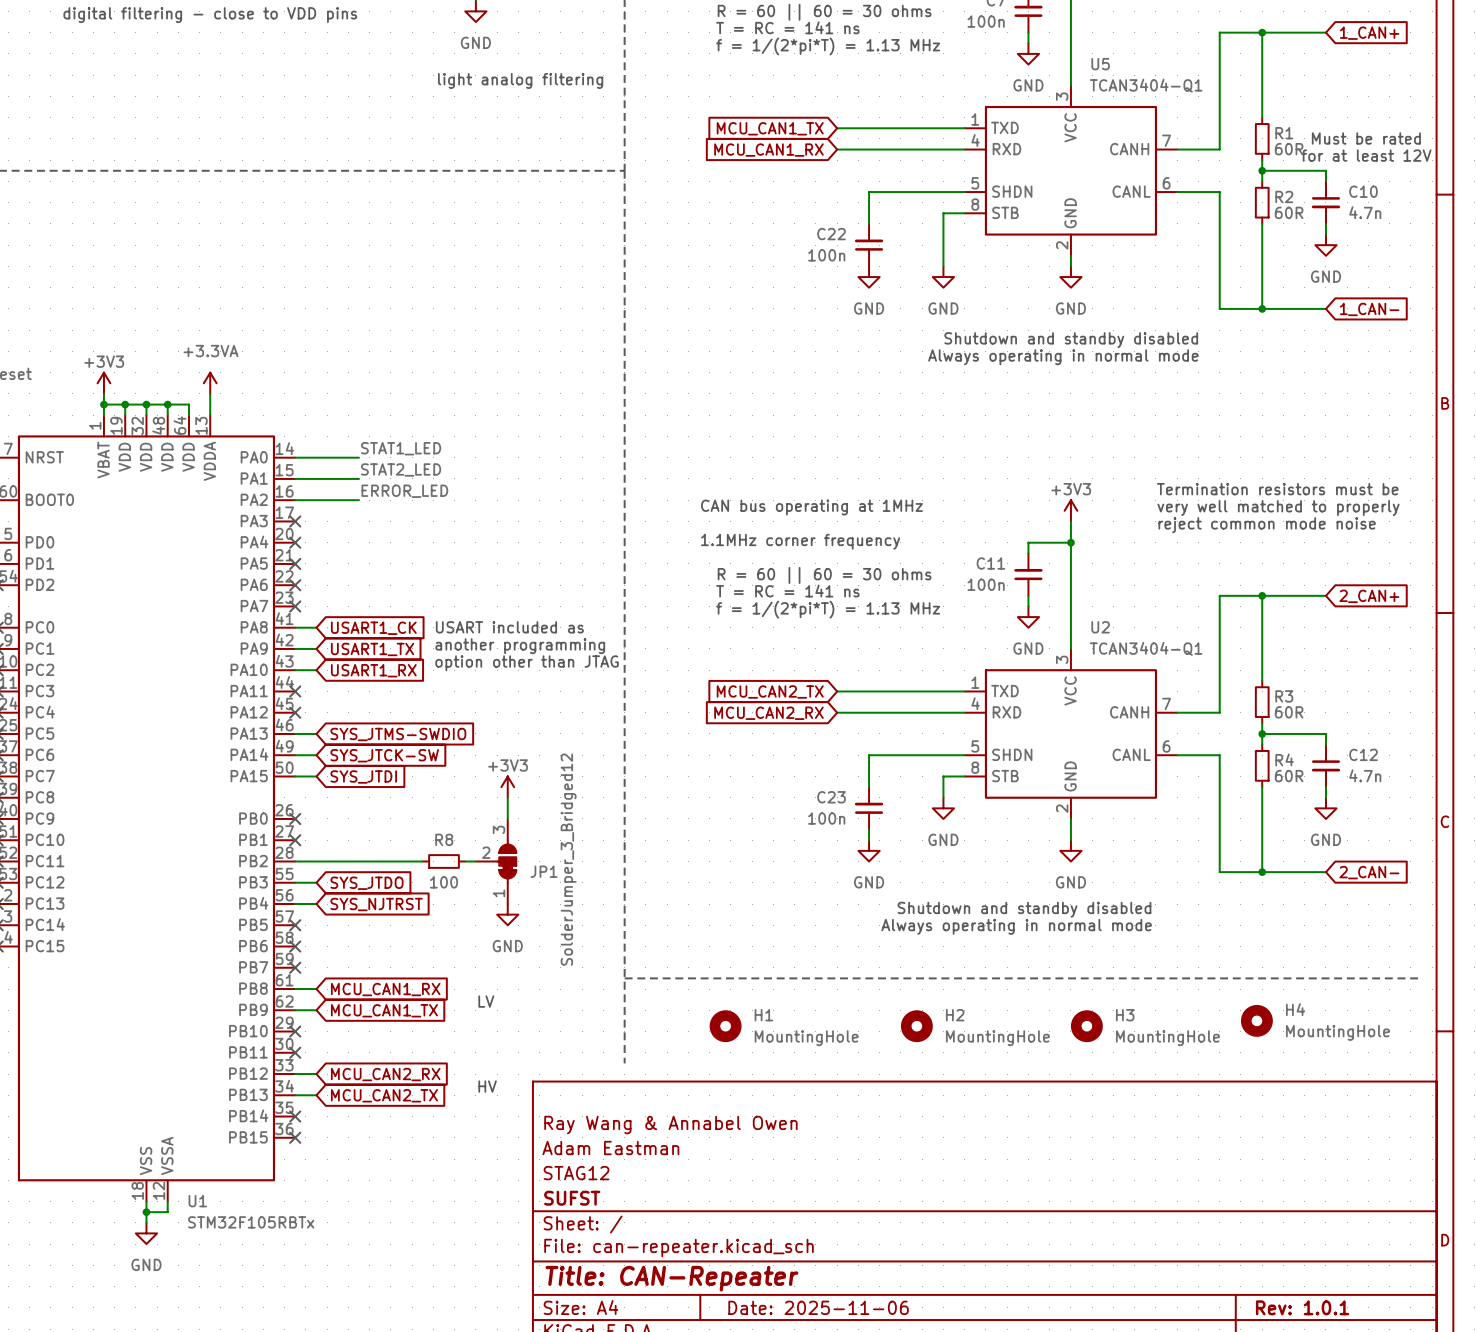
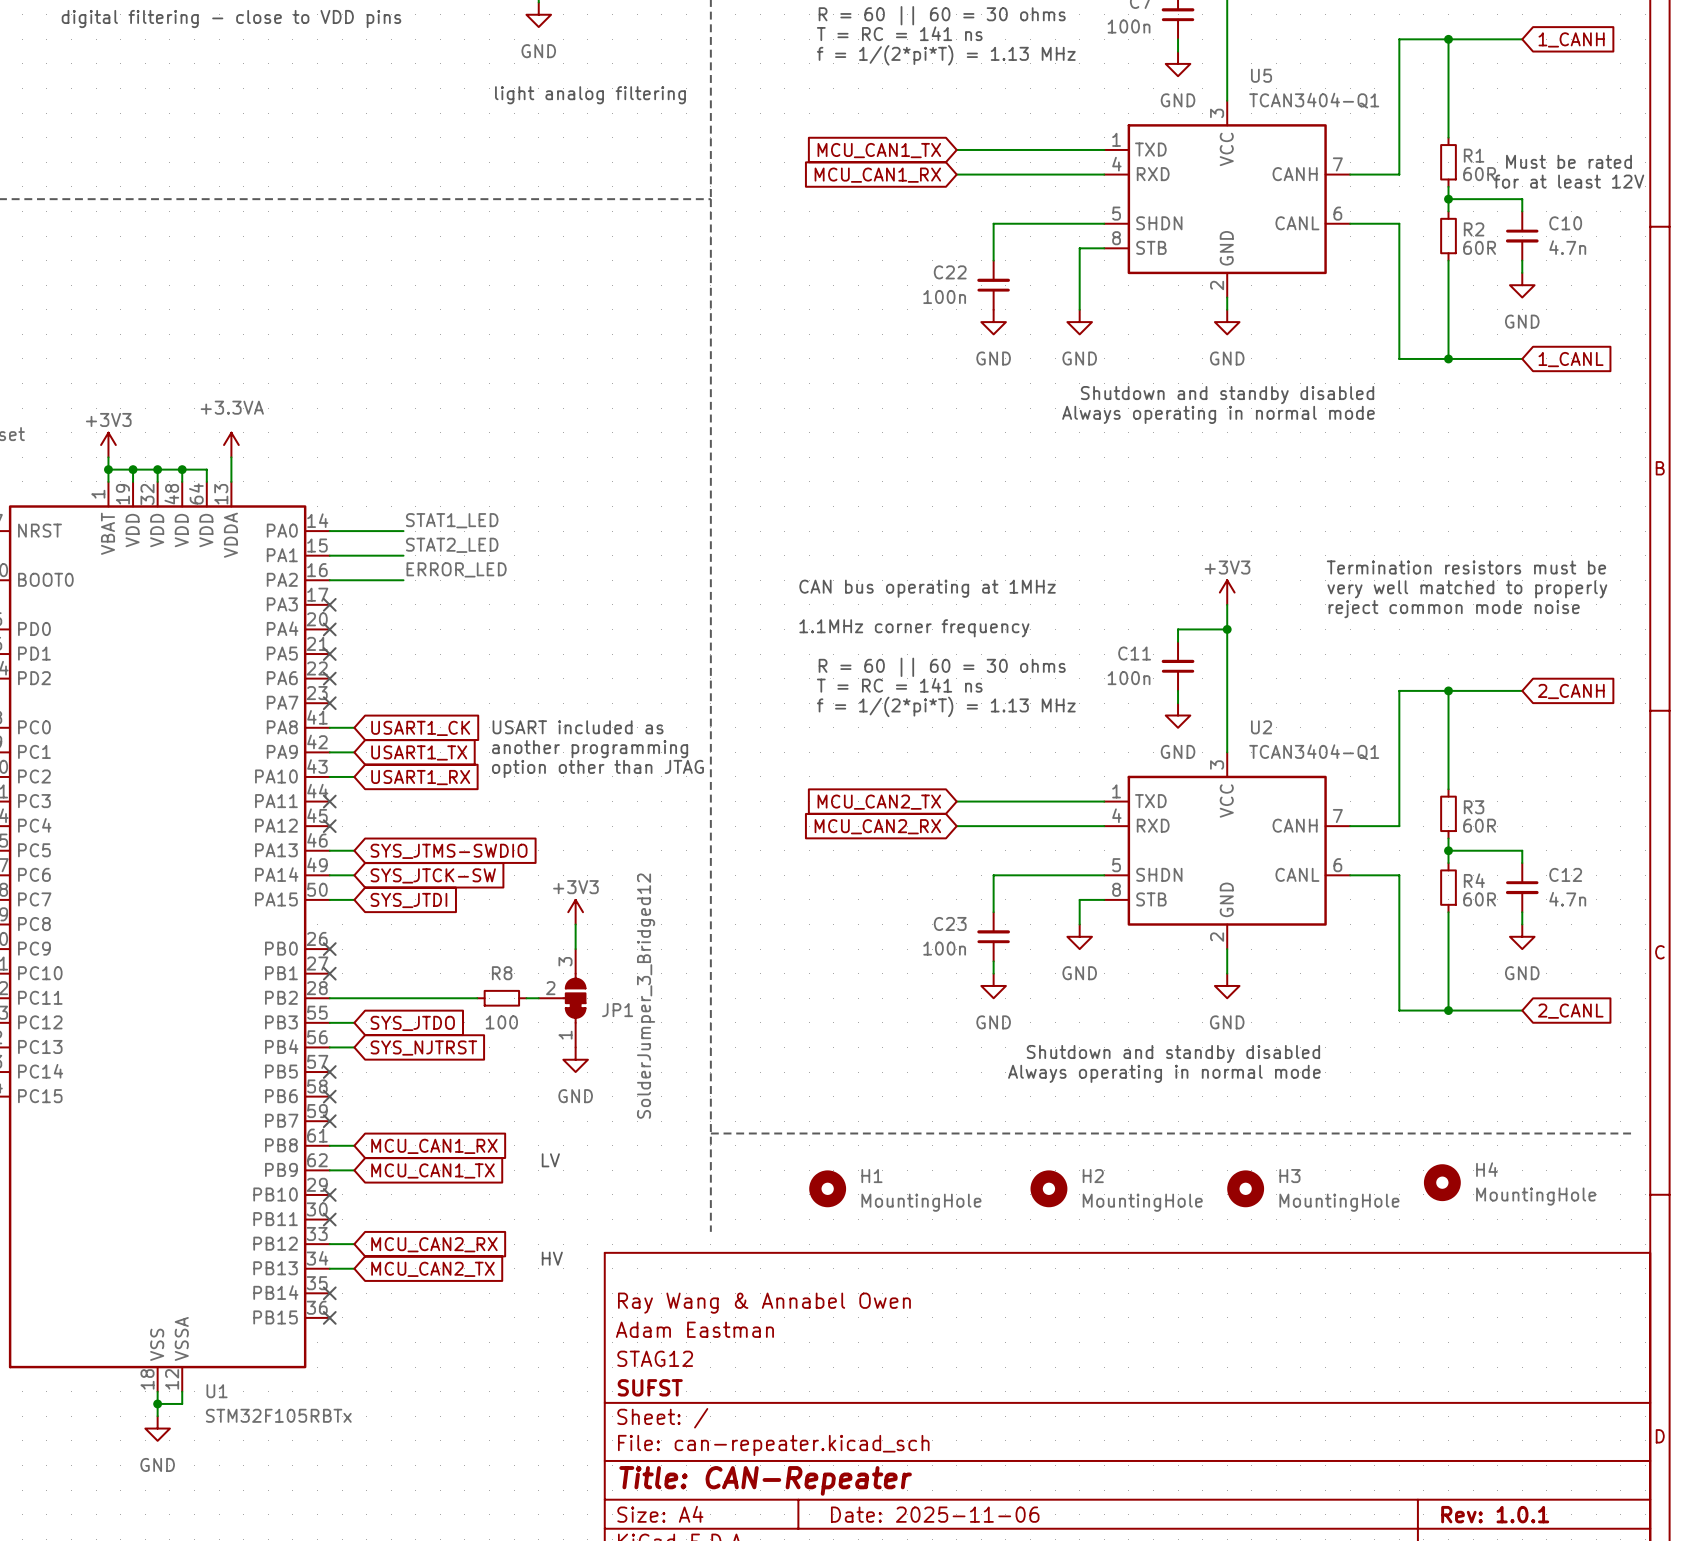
global label: 1_CAN+ (1369, 33) -> 1_CANH (1571, 39)
global label: 1_CAN- (1369, 309) -> 1_CANL (1571, 359)
global label: 2_CAN+ (1369, 596) -> 2_CANH (1571, 691)
global label: 2_CAN- (1369, 872) -> 2_CANL (1570, 1011)

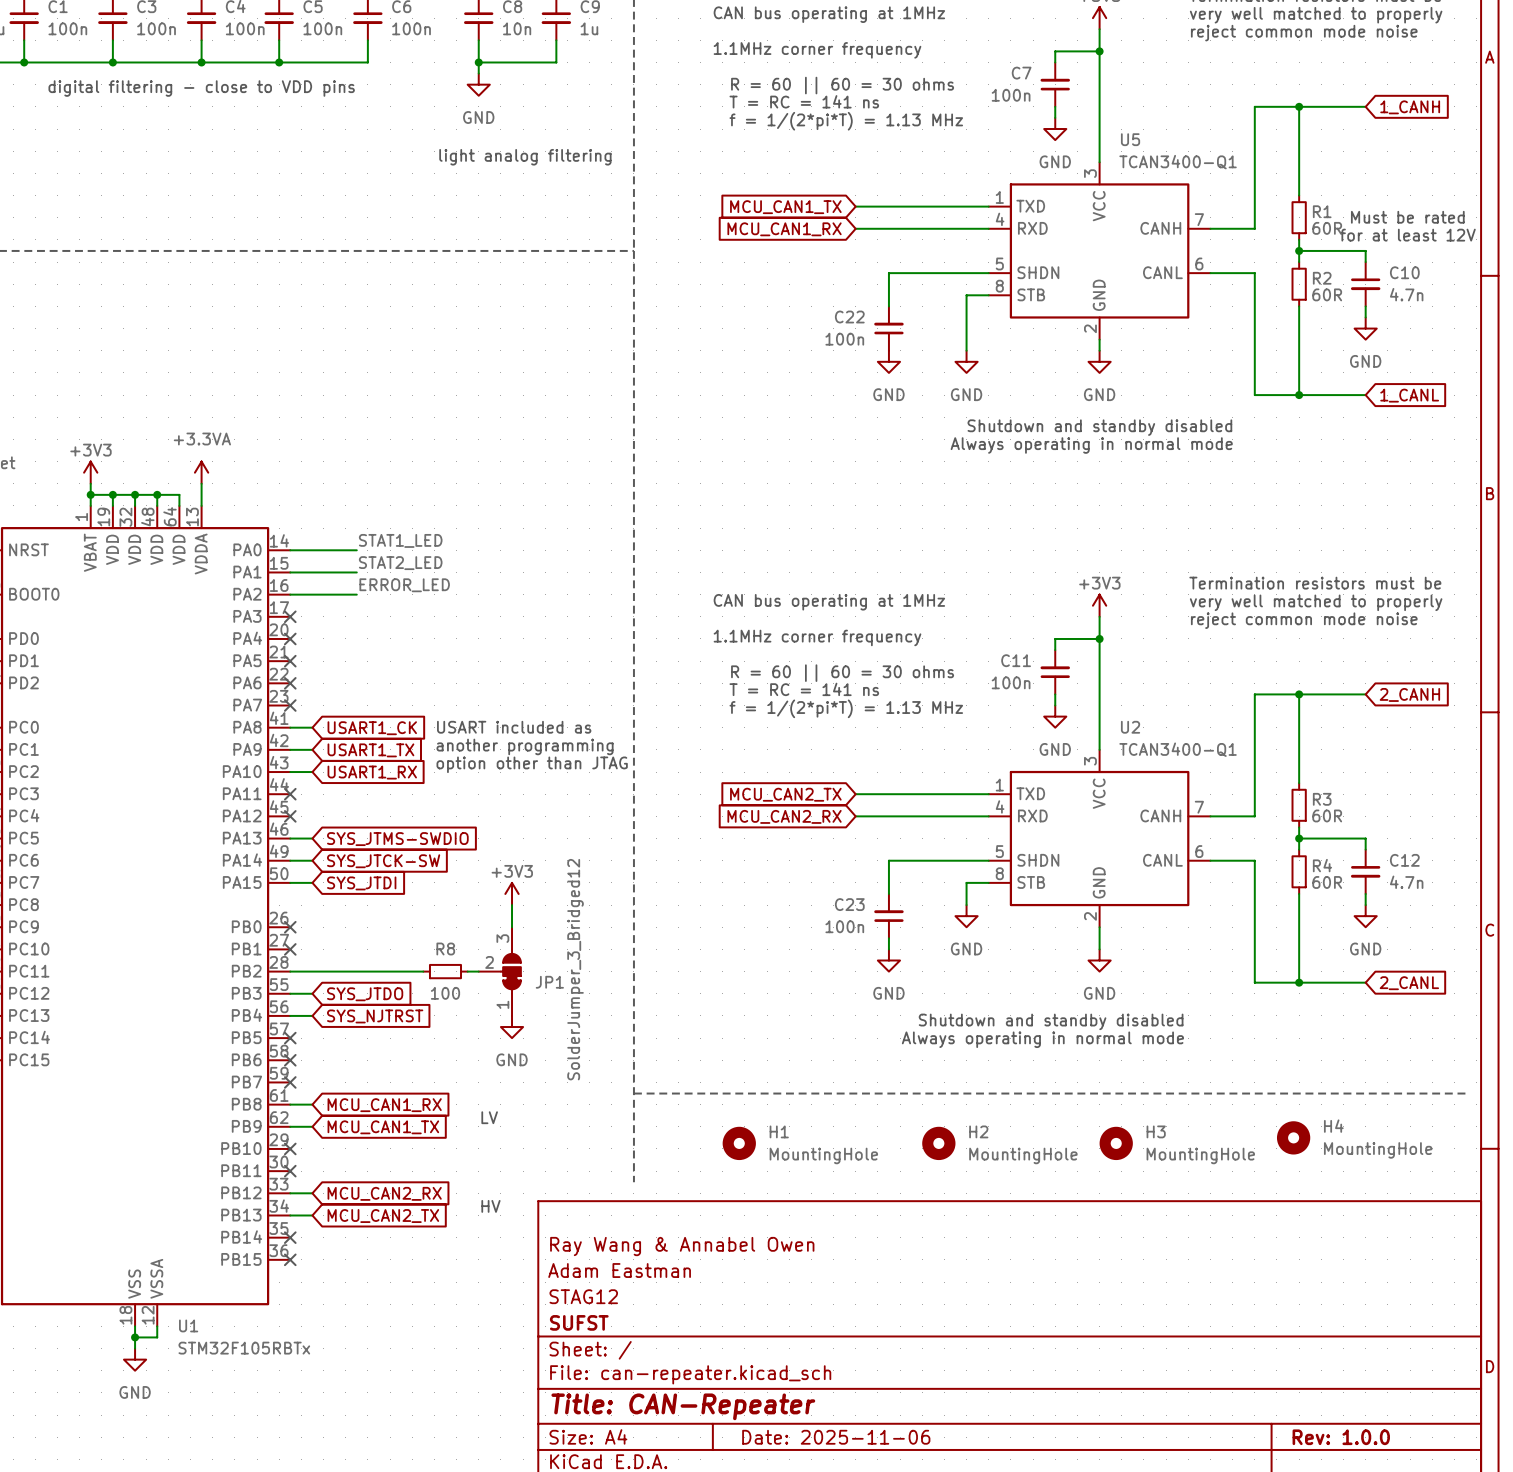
U5 value: TCAN3404-Q1 (1314, 100) -> TCAN3400-Q1 (1178, 162)
U2 value: TCAN3404-Q1 (1314, 752) -> TCAN3400-Q1 (1178, 749)
title block: Rev: 1.0.1 (1495, 1514) -> Rev: 1.0.0 (1341, 1437)

